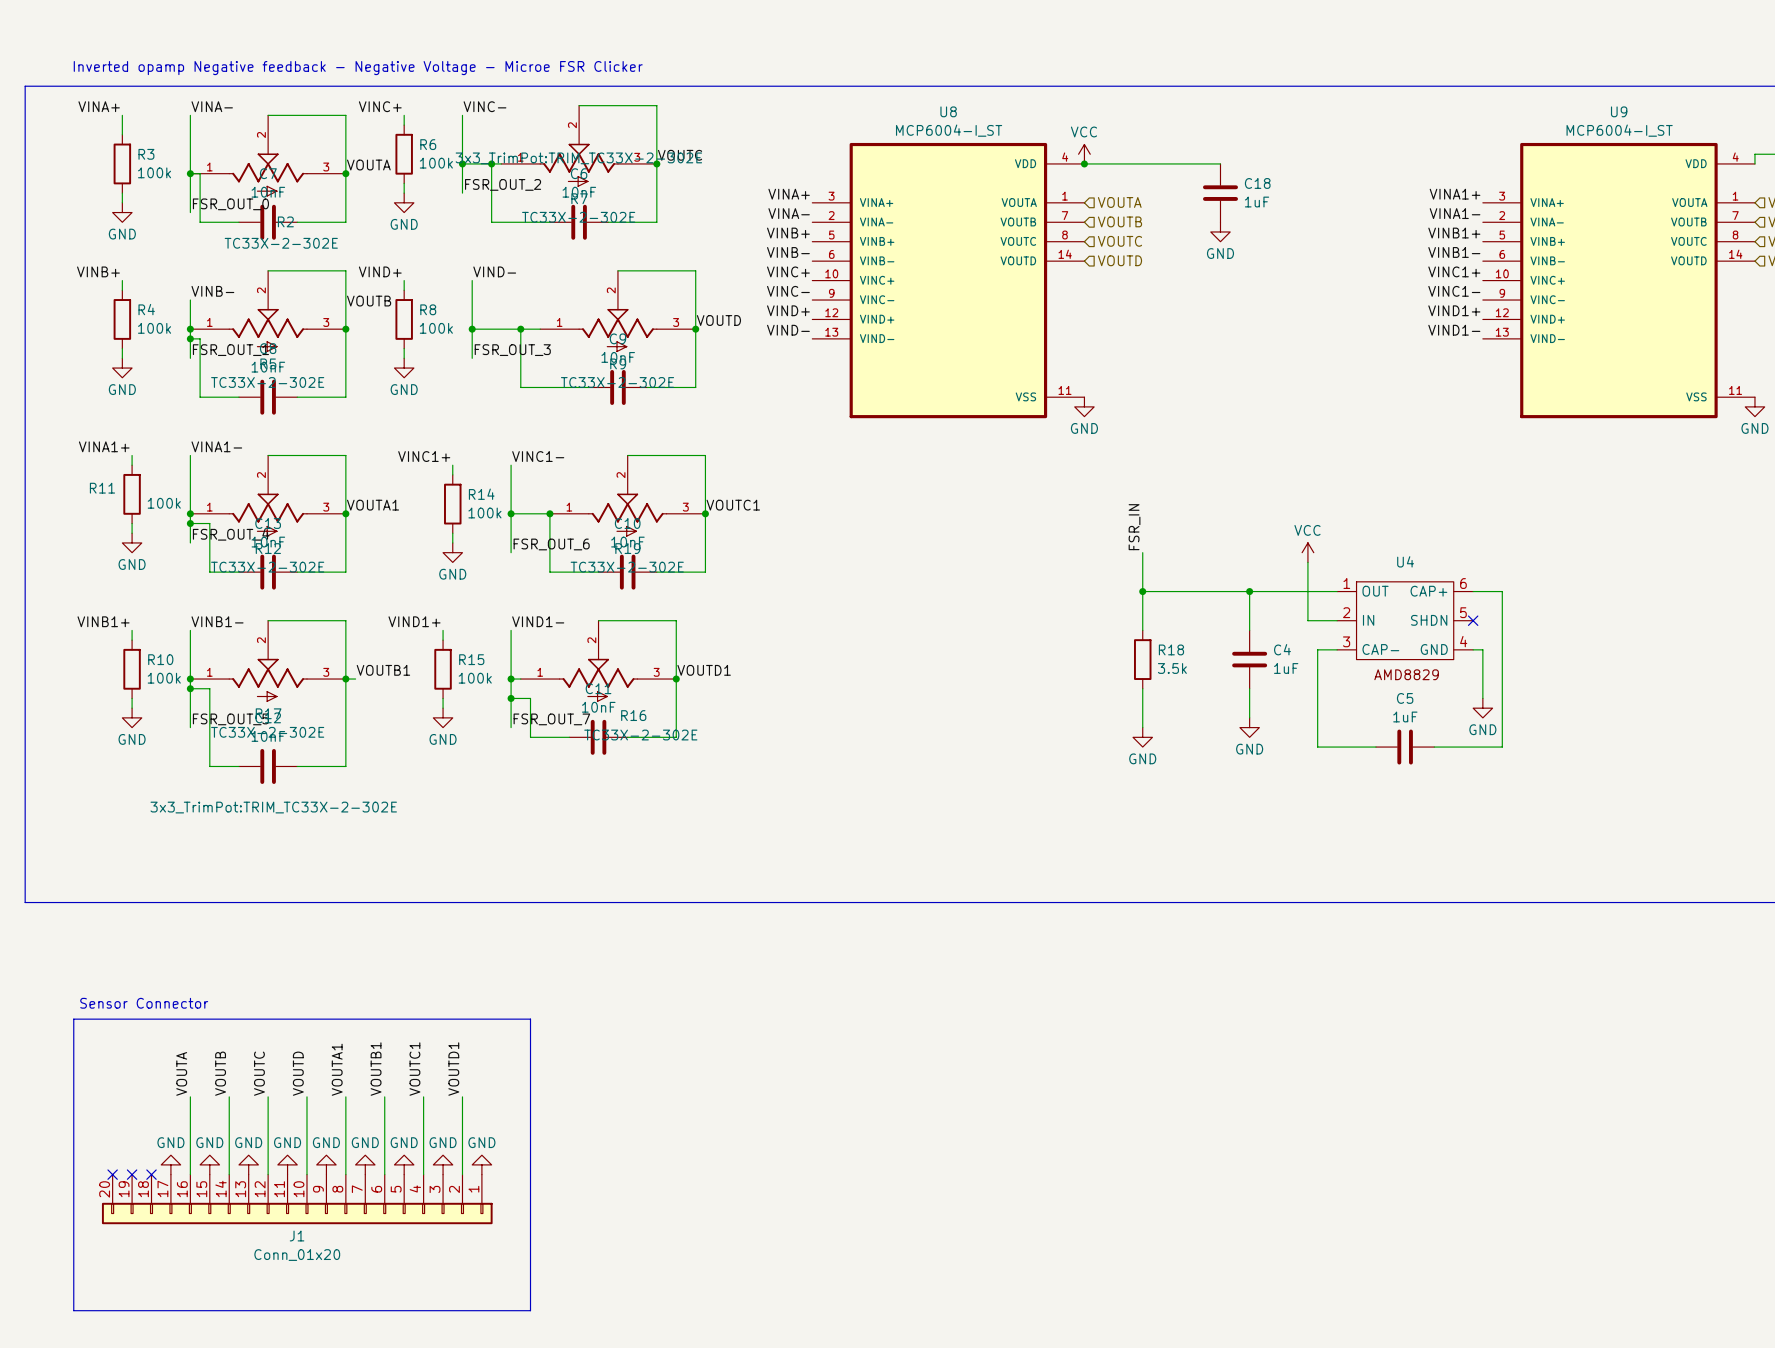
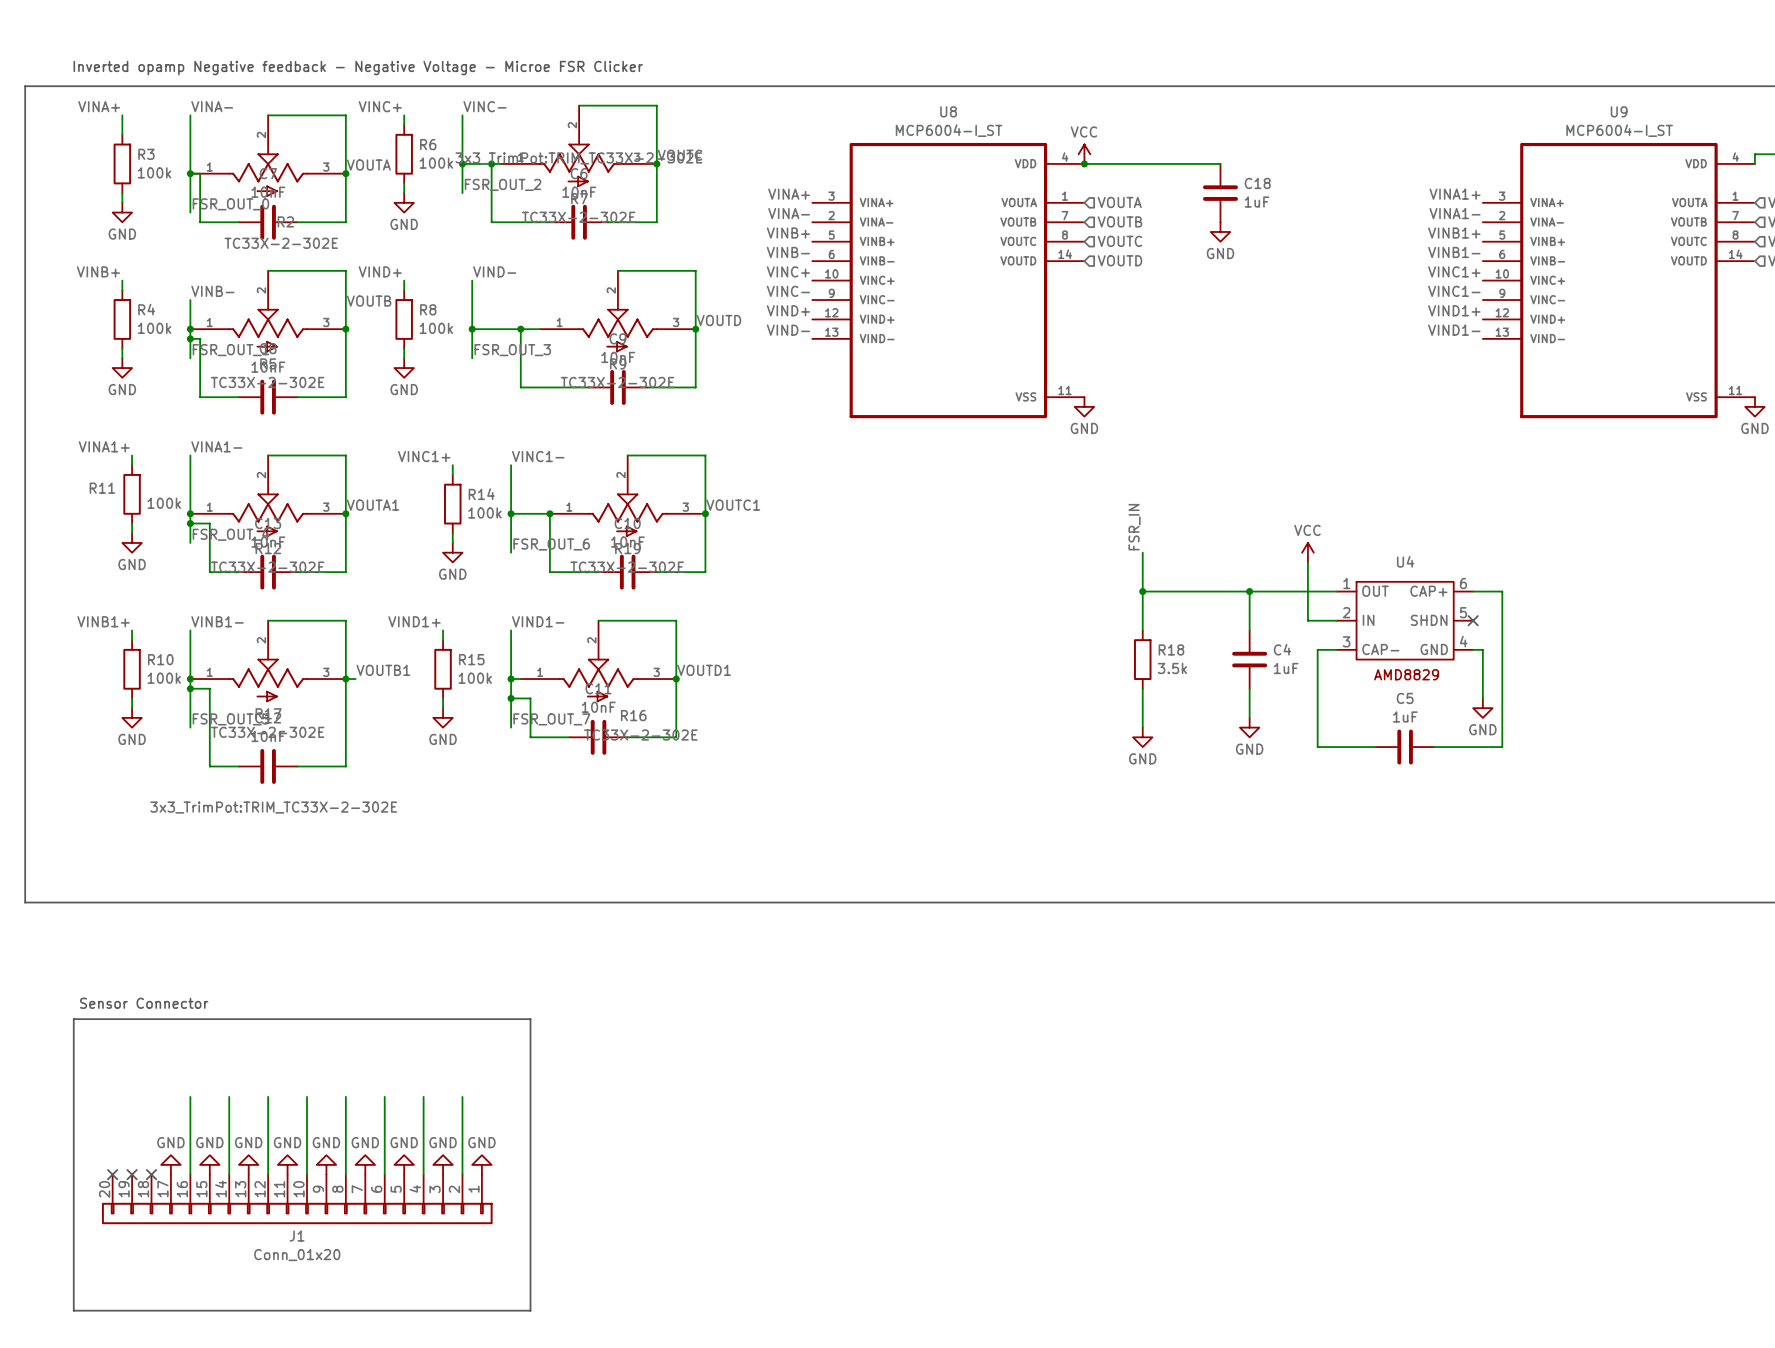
label: VOUTA1 (337, 1069) -> none
label: VOUTB1 (376, 1069) -> none
label: VOUTC1 (414, 1069) -> none
label: VOUTD1 (453, 1069) -> none
label: VOUTA (181, 1073) -> none
label: VOUTB (220, 1073) -> none
label: VOUTC (259, 1073) -> none
label: VOUTD (298, 1073) -> none

